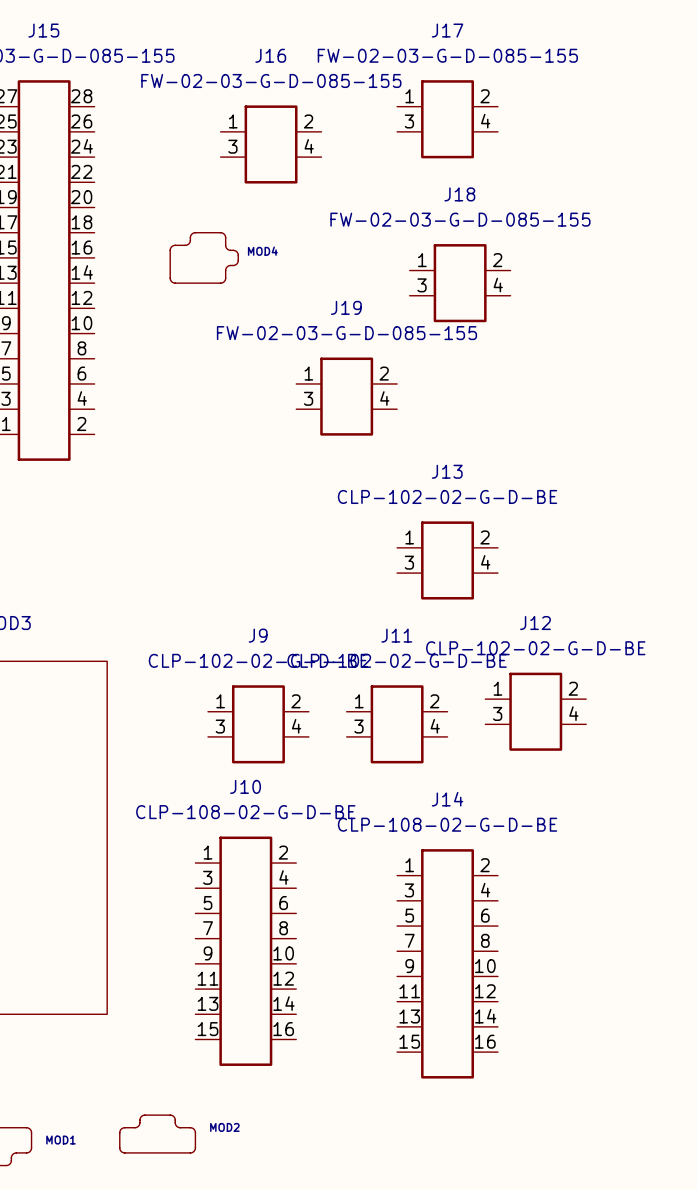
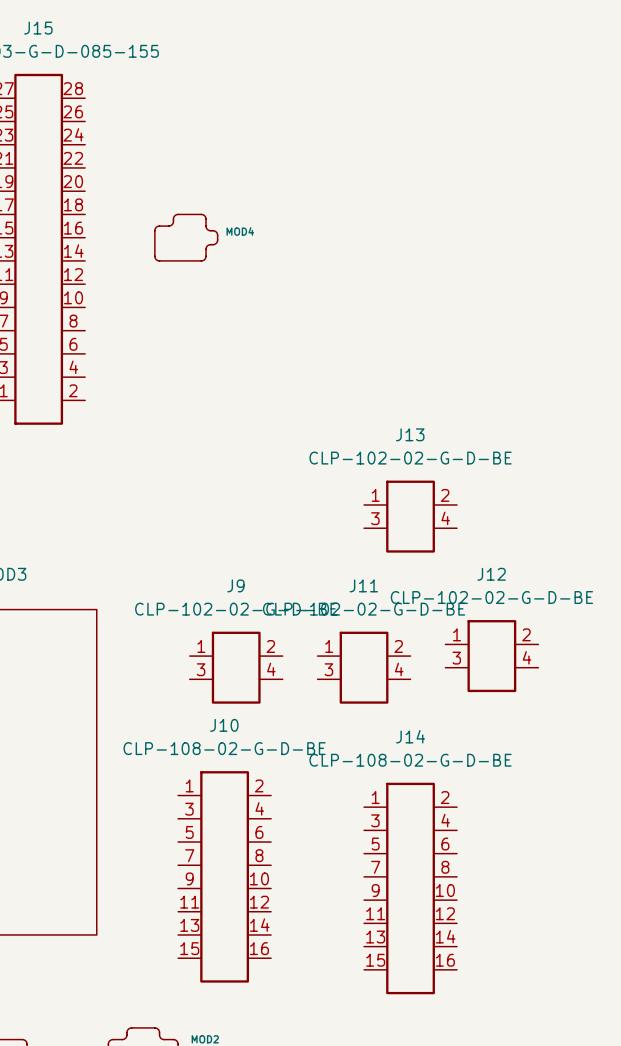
J17: FW-02-03-G-D-085-155 (447, 119) -> none
J16: FW-02-03-G-D-085-155 (271, 144) -> none
J18: FW-02-03-G-D-085-155 (460, 283) -> none
J19: FW-02-03-G-D-085-155 (346, 396) -> none

